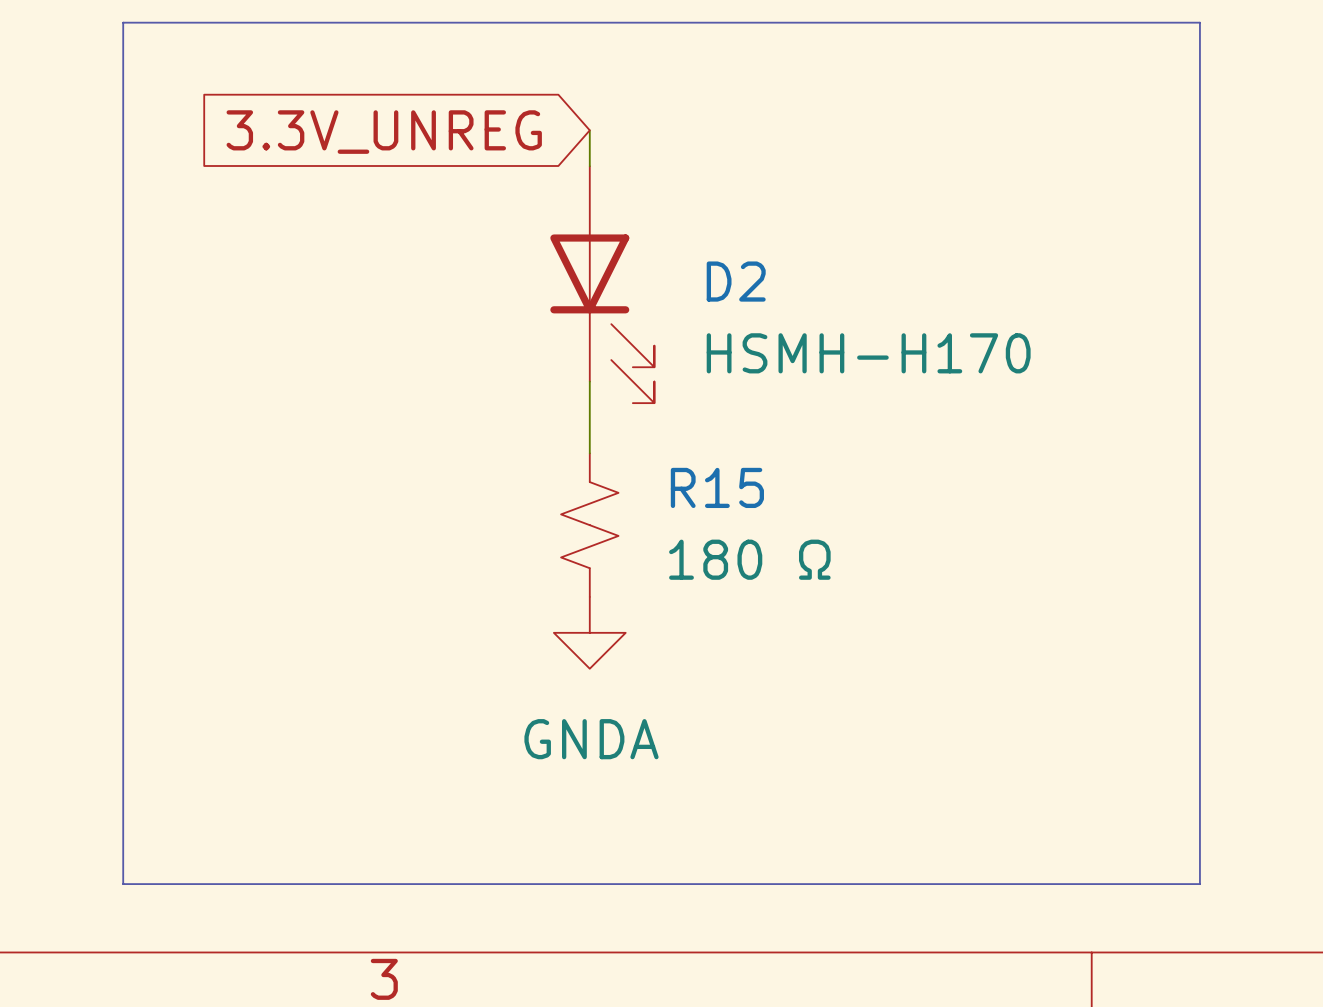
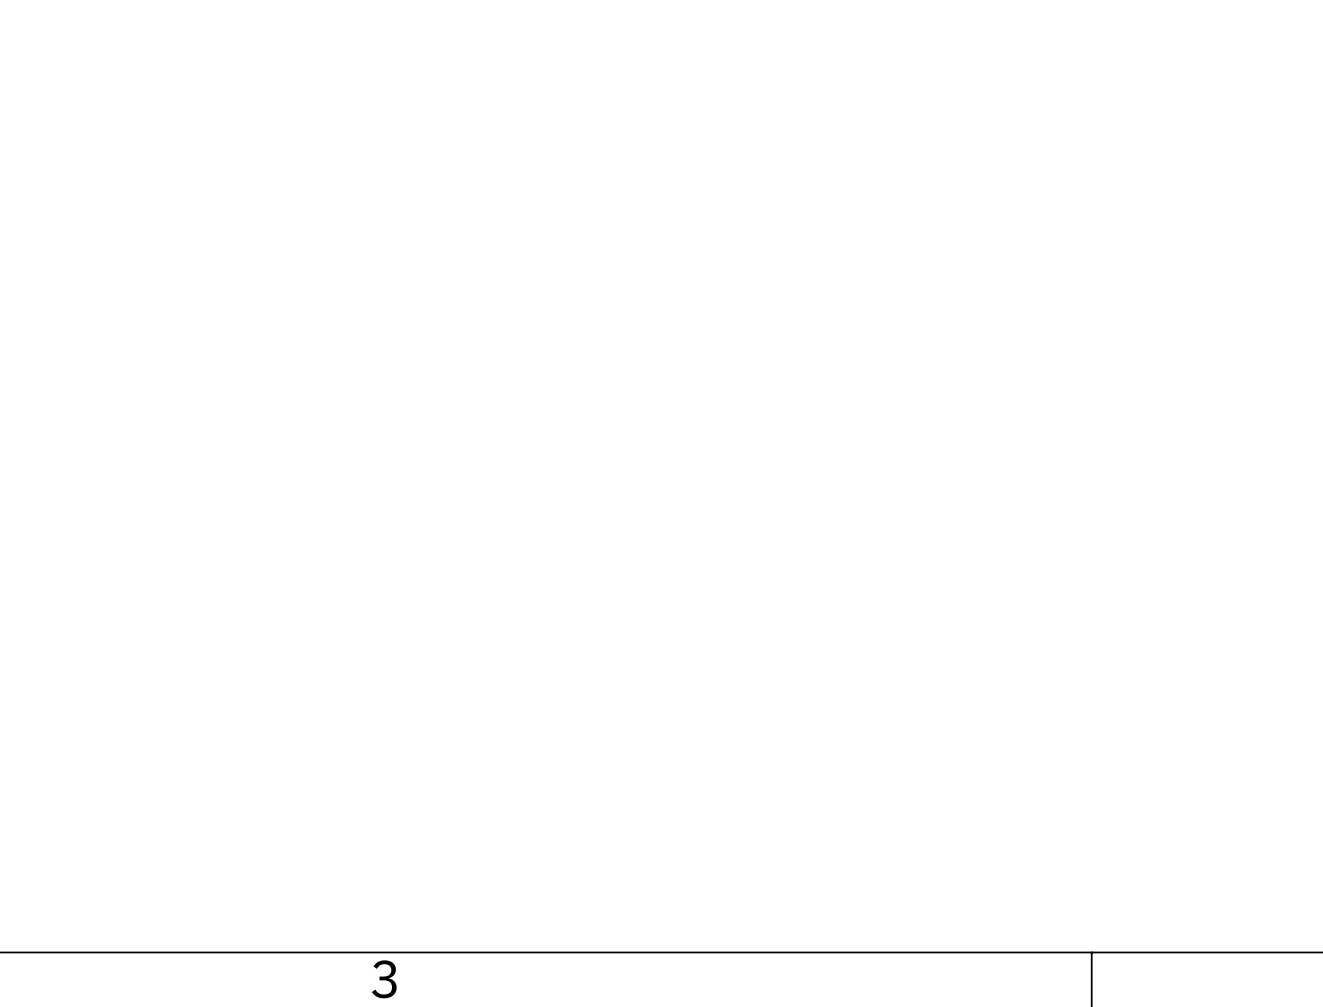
line: (123, 22) (1199, 22) (1199, 884) (123, 884) (123, 22) -> none
wire: (589, 130) (589, 166) -> none
global label: 3.3V_UNREG (384, 132) -> none
D2: HSMH-H170 (602, 284) -> none
wire: (589, 381) (589, 453) -> none
R15: 180 Ω (589, 525) -> none
power symbol: GNDA (589, 632) -> none

